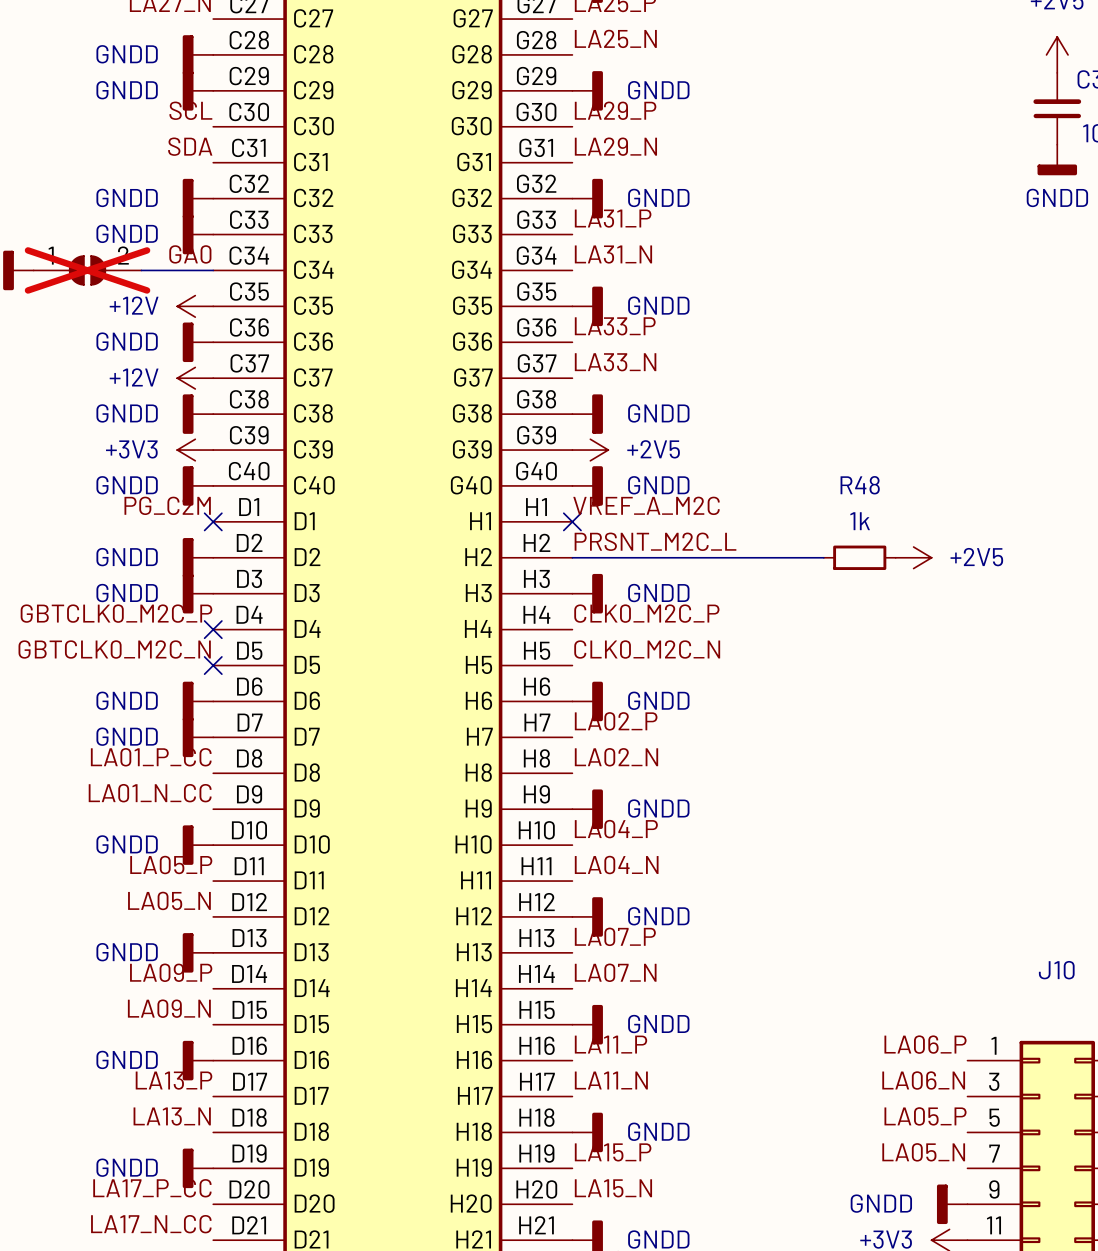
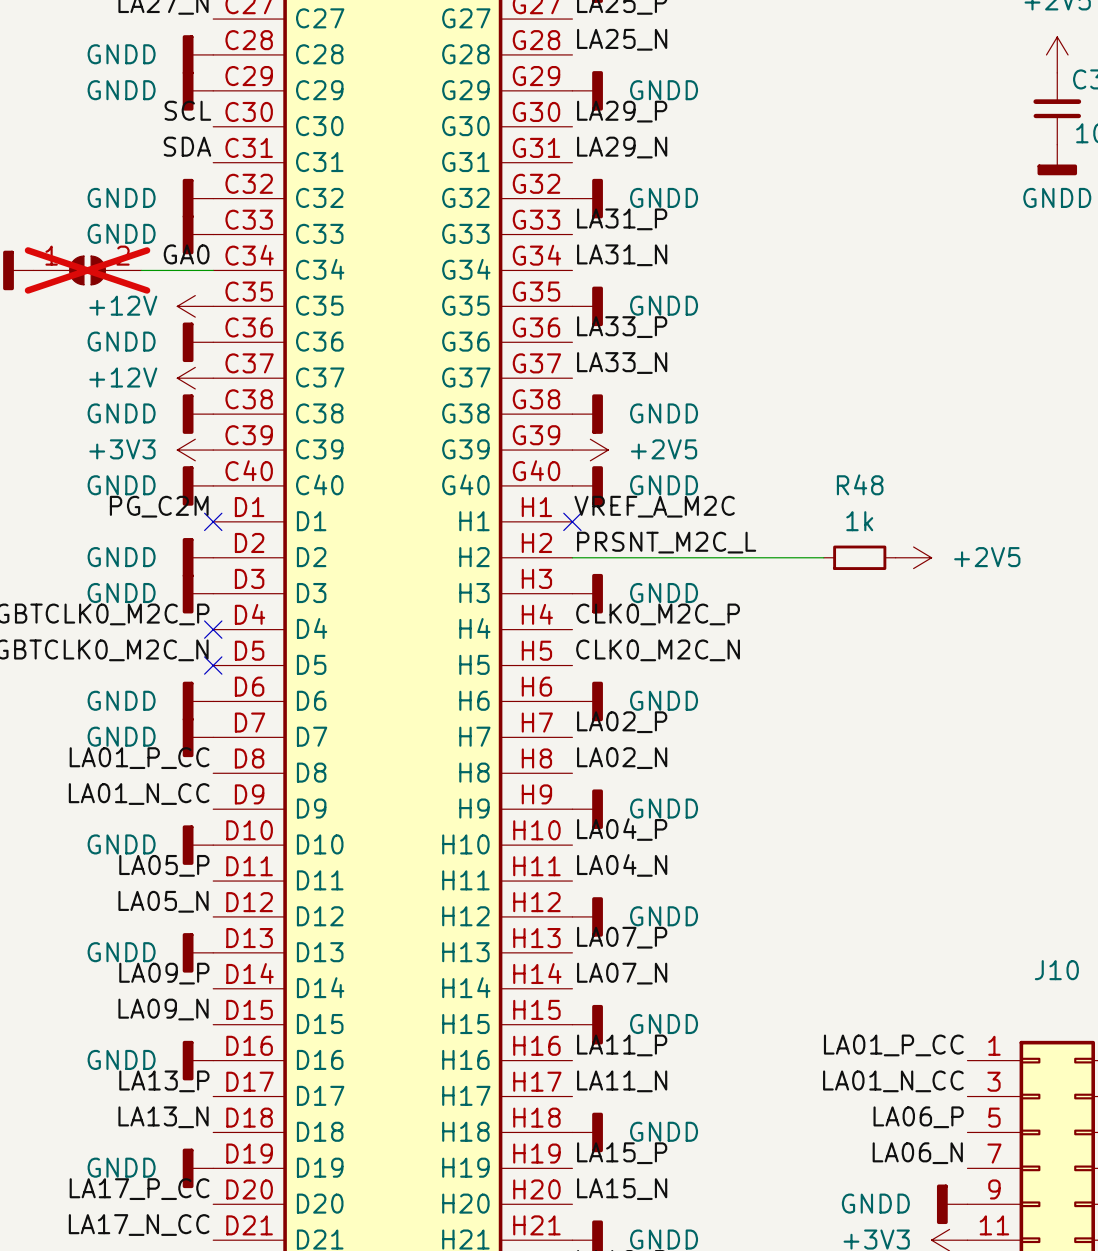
label: LA06_P (925, 1044) -> LA01_P_CC (893, 1045)
label: LA06_N (923, 1080) -> LA01_N_CC (893, 1081)
label: LA05_P (925, 1116) -> LA06_P (918, 1117)
label: LA05_N (923, 1152) -> LA06_N (917, 1153)

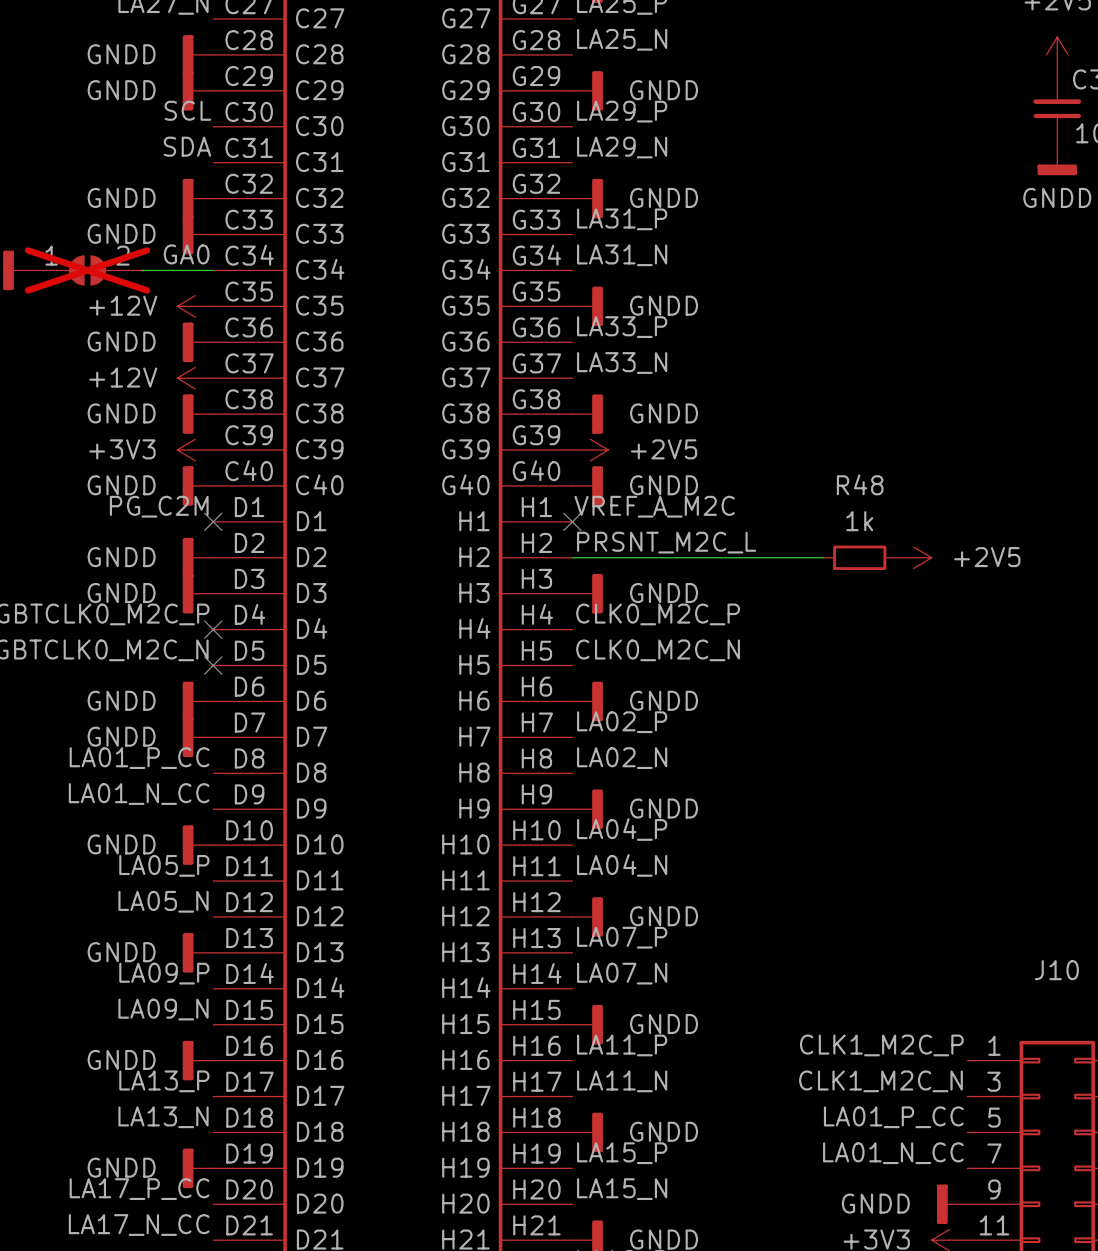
label: LA01_P_CC (893, 1045) -> CLK1_M2C_P (881, 1045)
label: LA01_N_CC (893, 1081) -> CLK1_M2C_N (880, 1081)
label: LA06_P (918, 1117) -> LA01_P_CC (893, 1117)
label: LA06_N (917, 1153) -> LA01_N_CC (893, 1153)

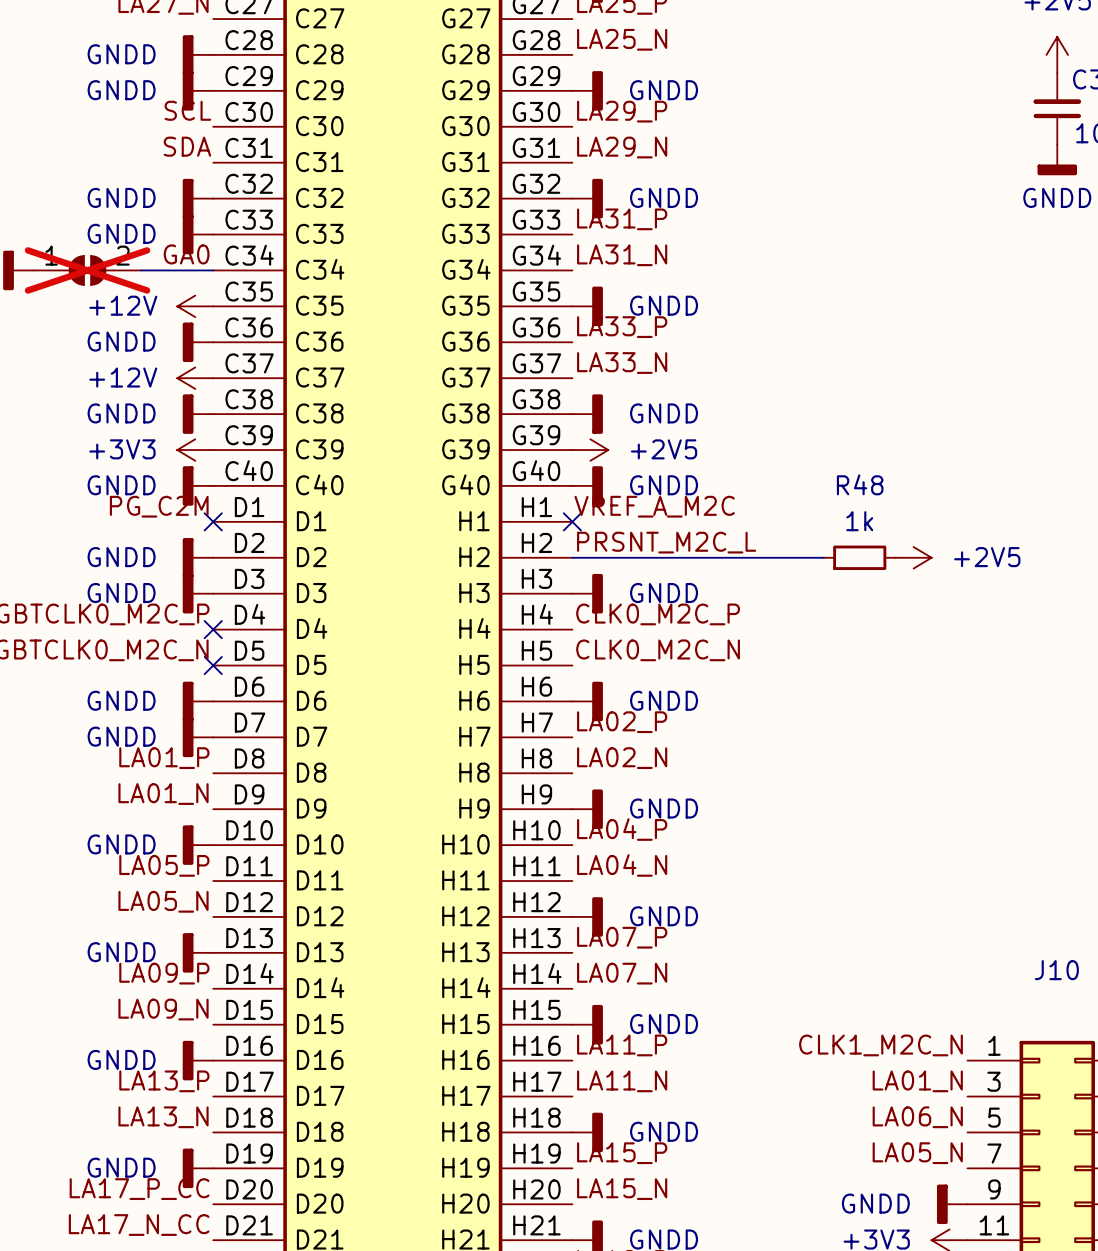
label: LA01_P_CC (139, 758) -> LA01_P (164, 758)
label: LA01_N_CC (139, 794) -> LA01_N (163, 794)
label: CLK1_M2C_P (881, 1045) -> CLK1_M2C_N (880, 1045)
label: CLK1_M2C_N (880, 1081) -> LA01_N (917, 1081)
label: LA01_P_CC (893, 1117) -> LA06_N (917, 1117)
label: LA01_N_CC (893, 1153) -> LA05_N (917, 1153)

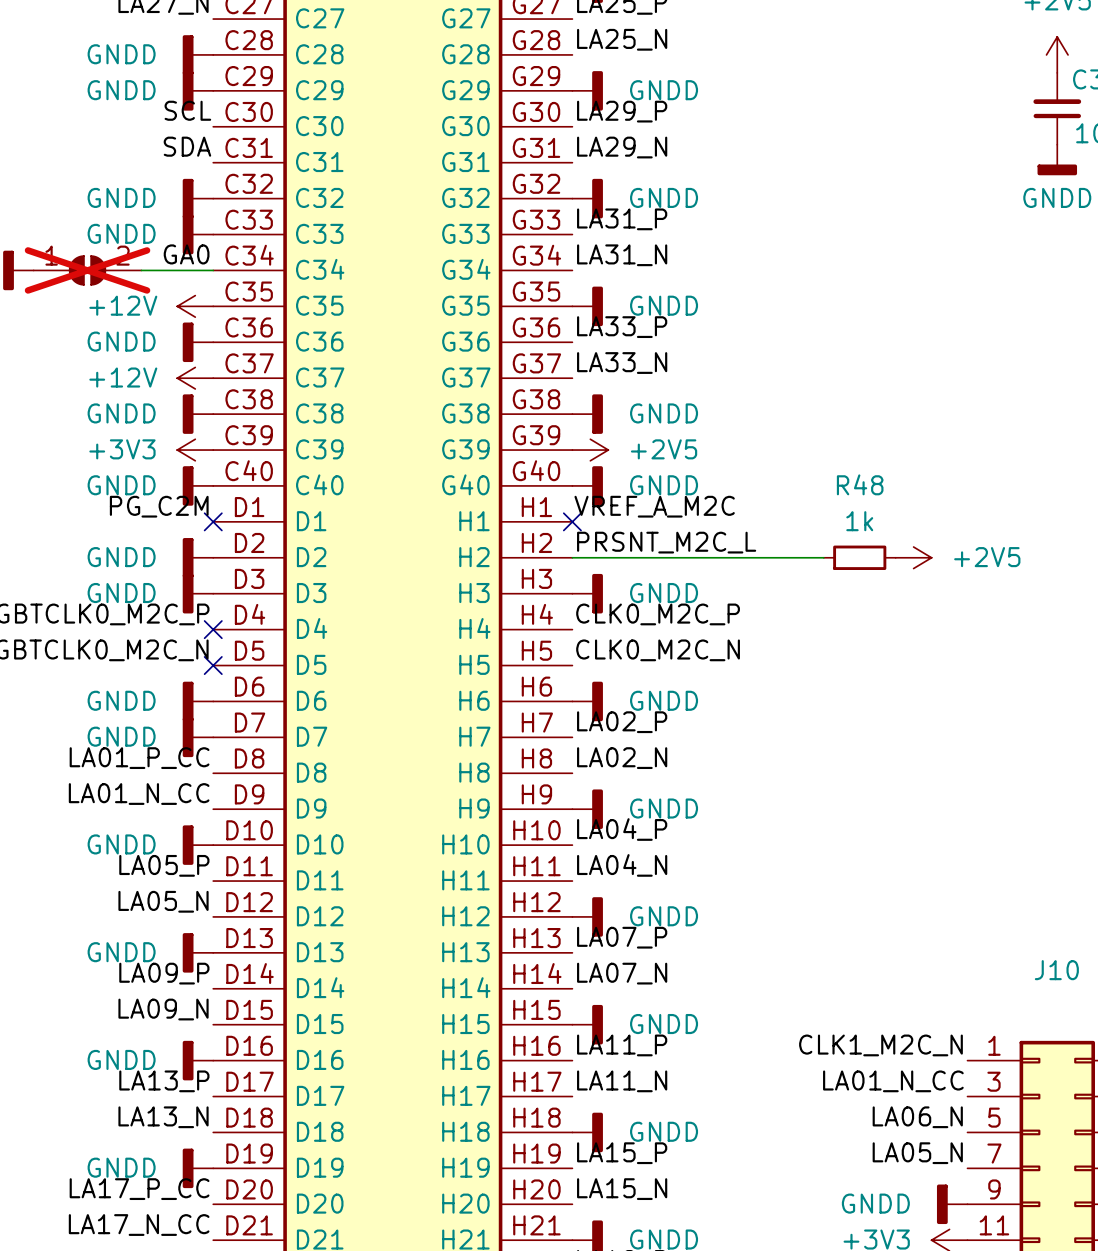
label: LA01_P (164, 758) -> LA01_P_CC (139, 758)
label: LA01_N (163, 794) -> LA01_N_CC (139, 794)
label: LA01_N (917, 1081) -> LA01_N_CC (893, 1081)

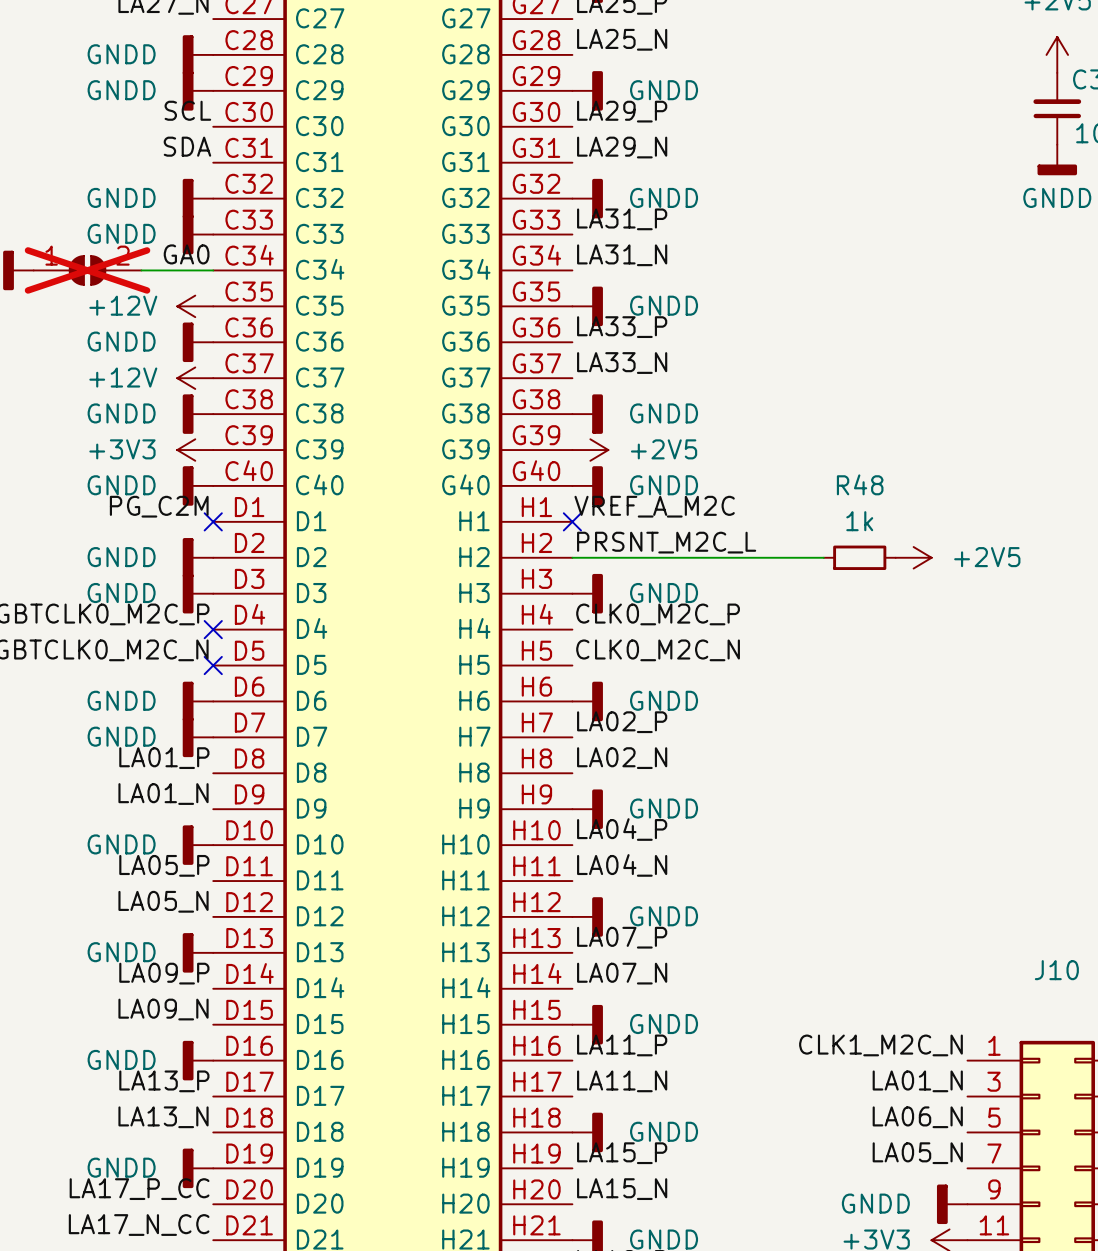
label: LA01_P_CC (139, 758) -> LA01_P (164, 758)
label: LA01_N_CC (139, 794) -> LA01_N (163, 794)
label: LA01_N_CC (893, 1081) -> LA01_N (917, 1081)

